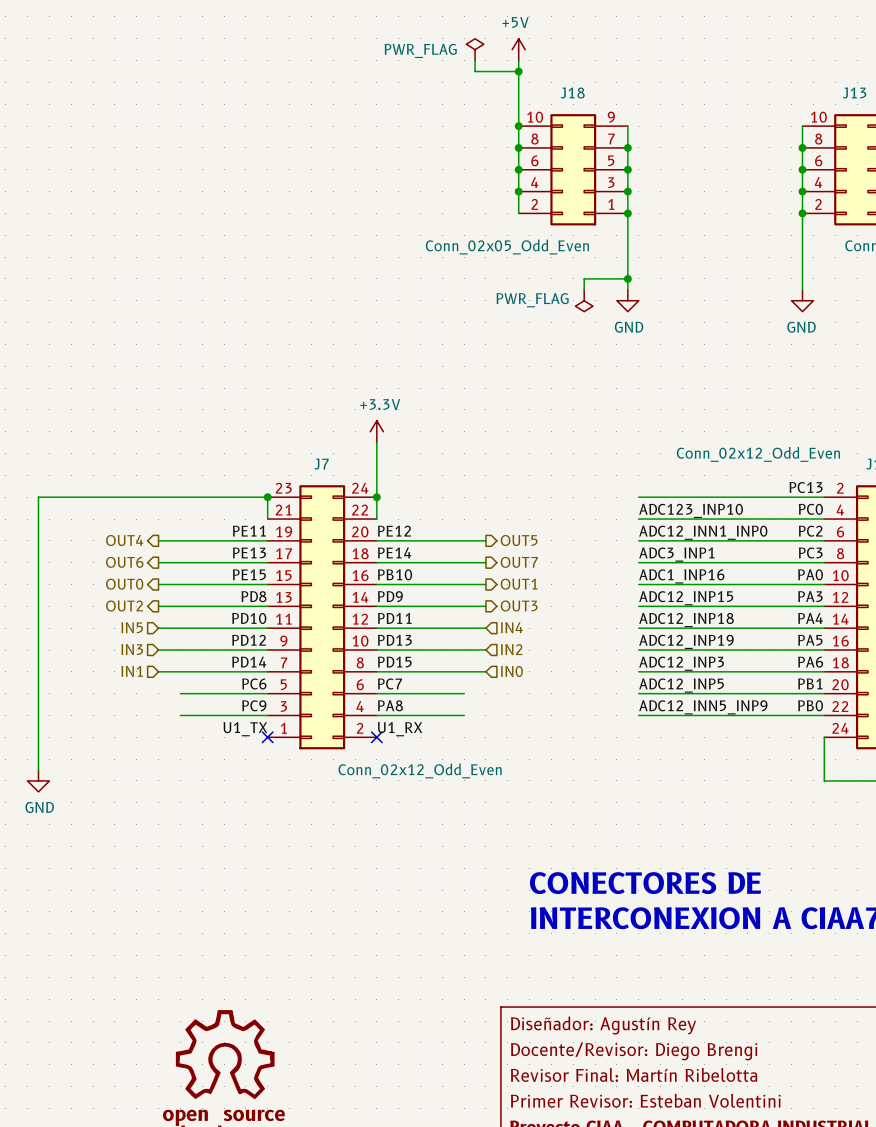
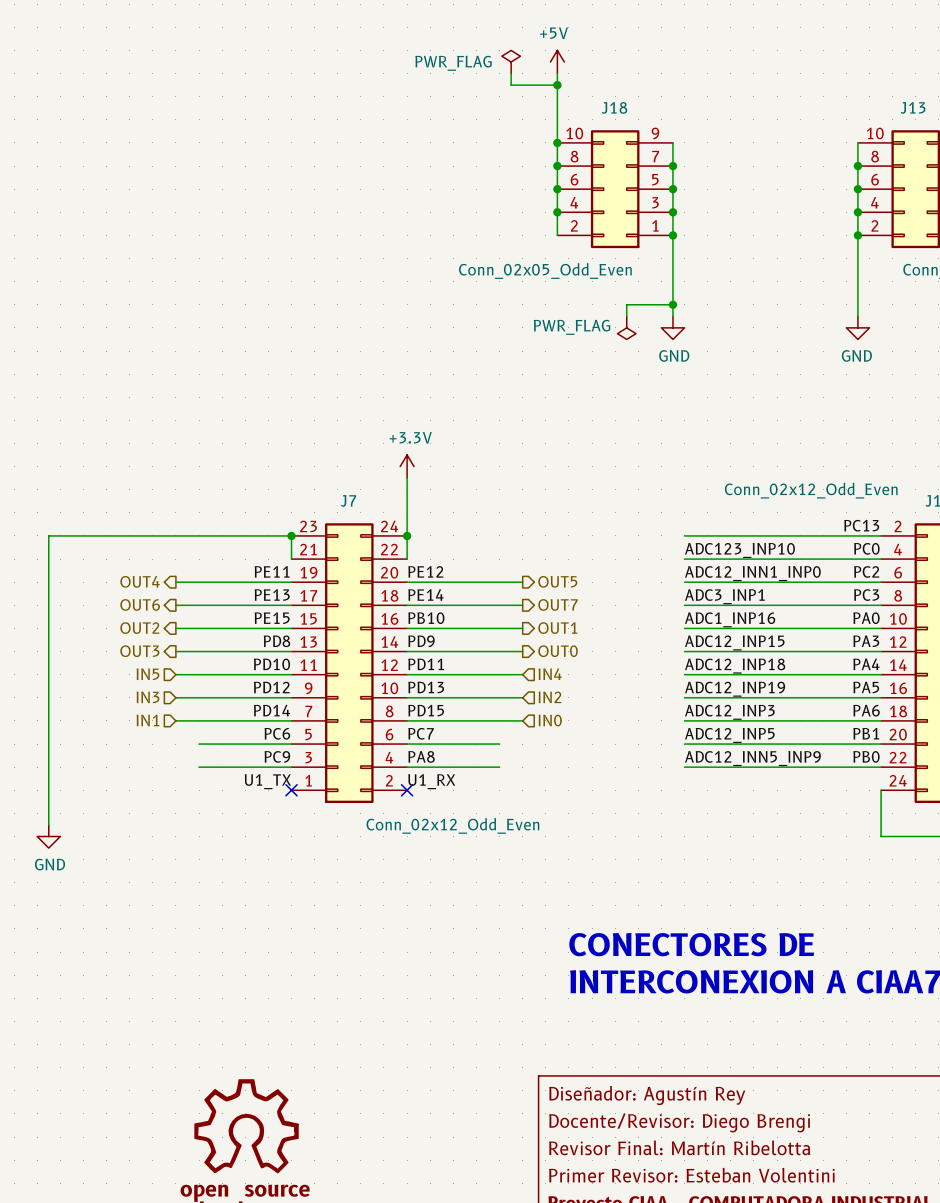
hierarchical label: OUT0 (124, 584) -> OUT2 (139, 628)
hierarchical label: OUT2 (124, 605) -> OUT3 (139, 651)
hierarchical label: OUT3 (519, 605) -> OUT0 (558, 651)

